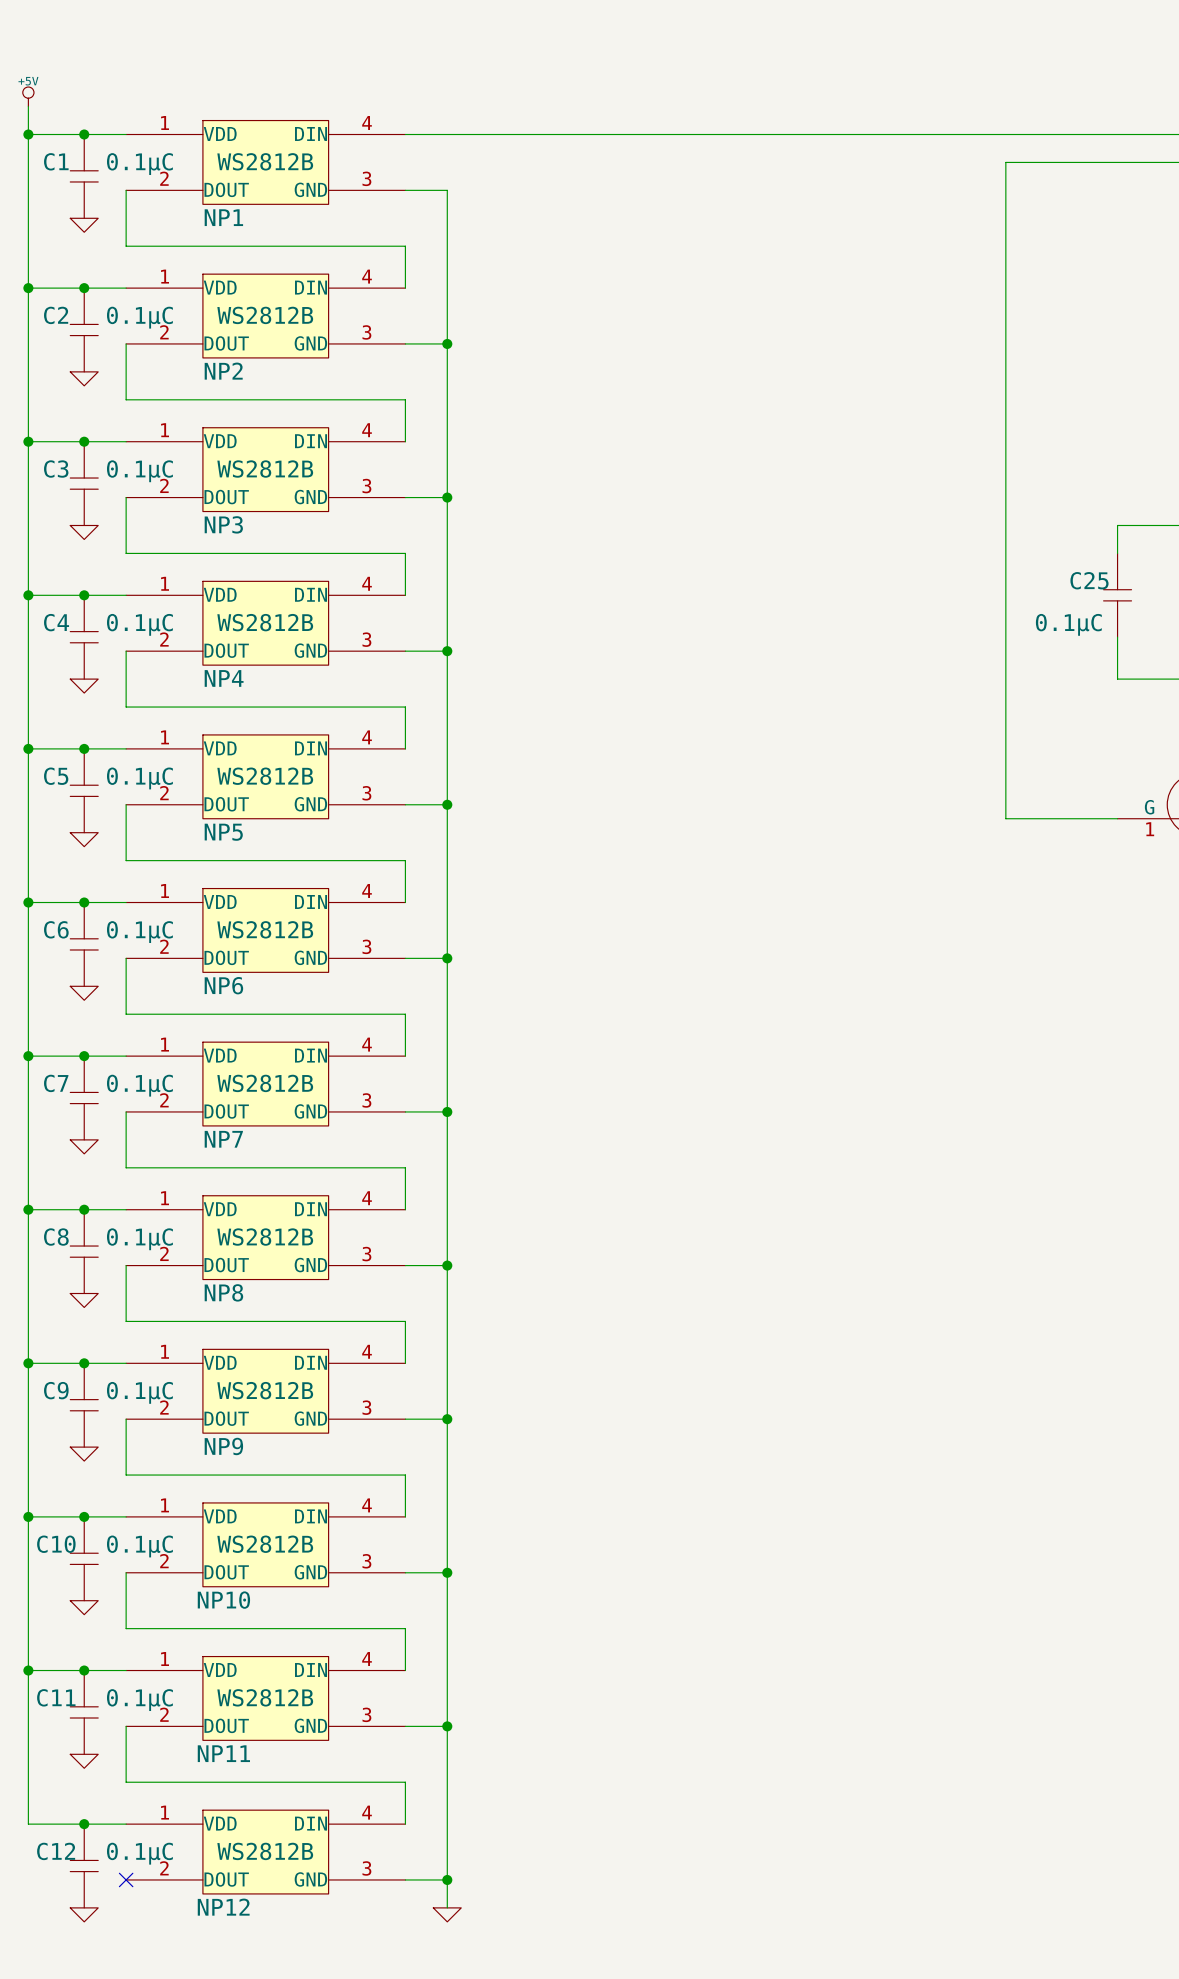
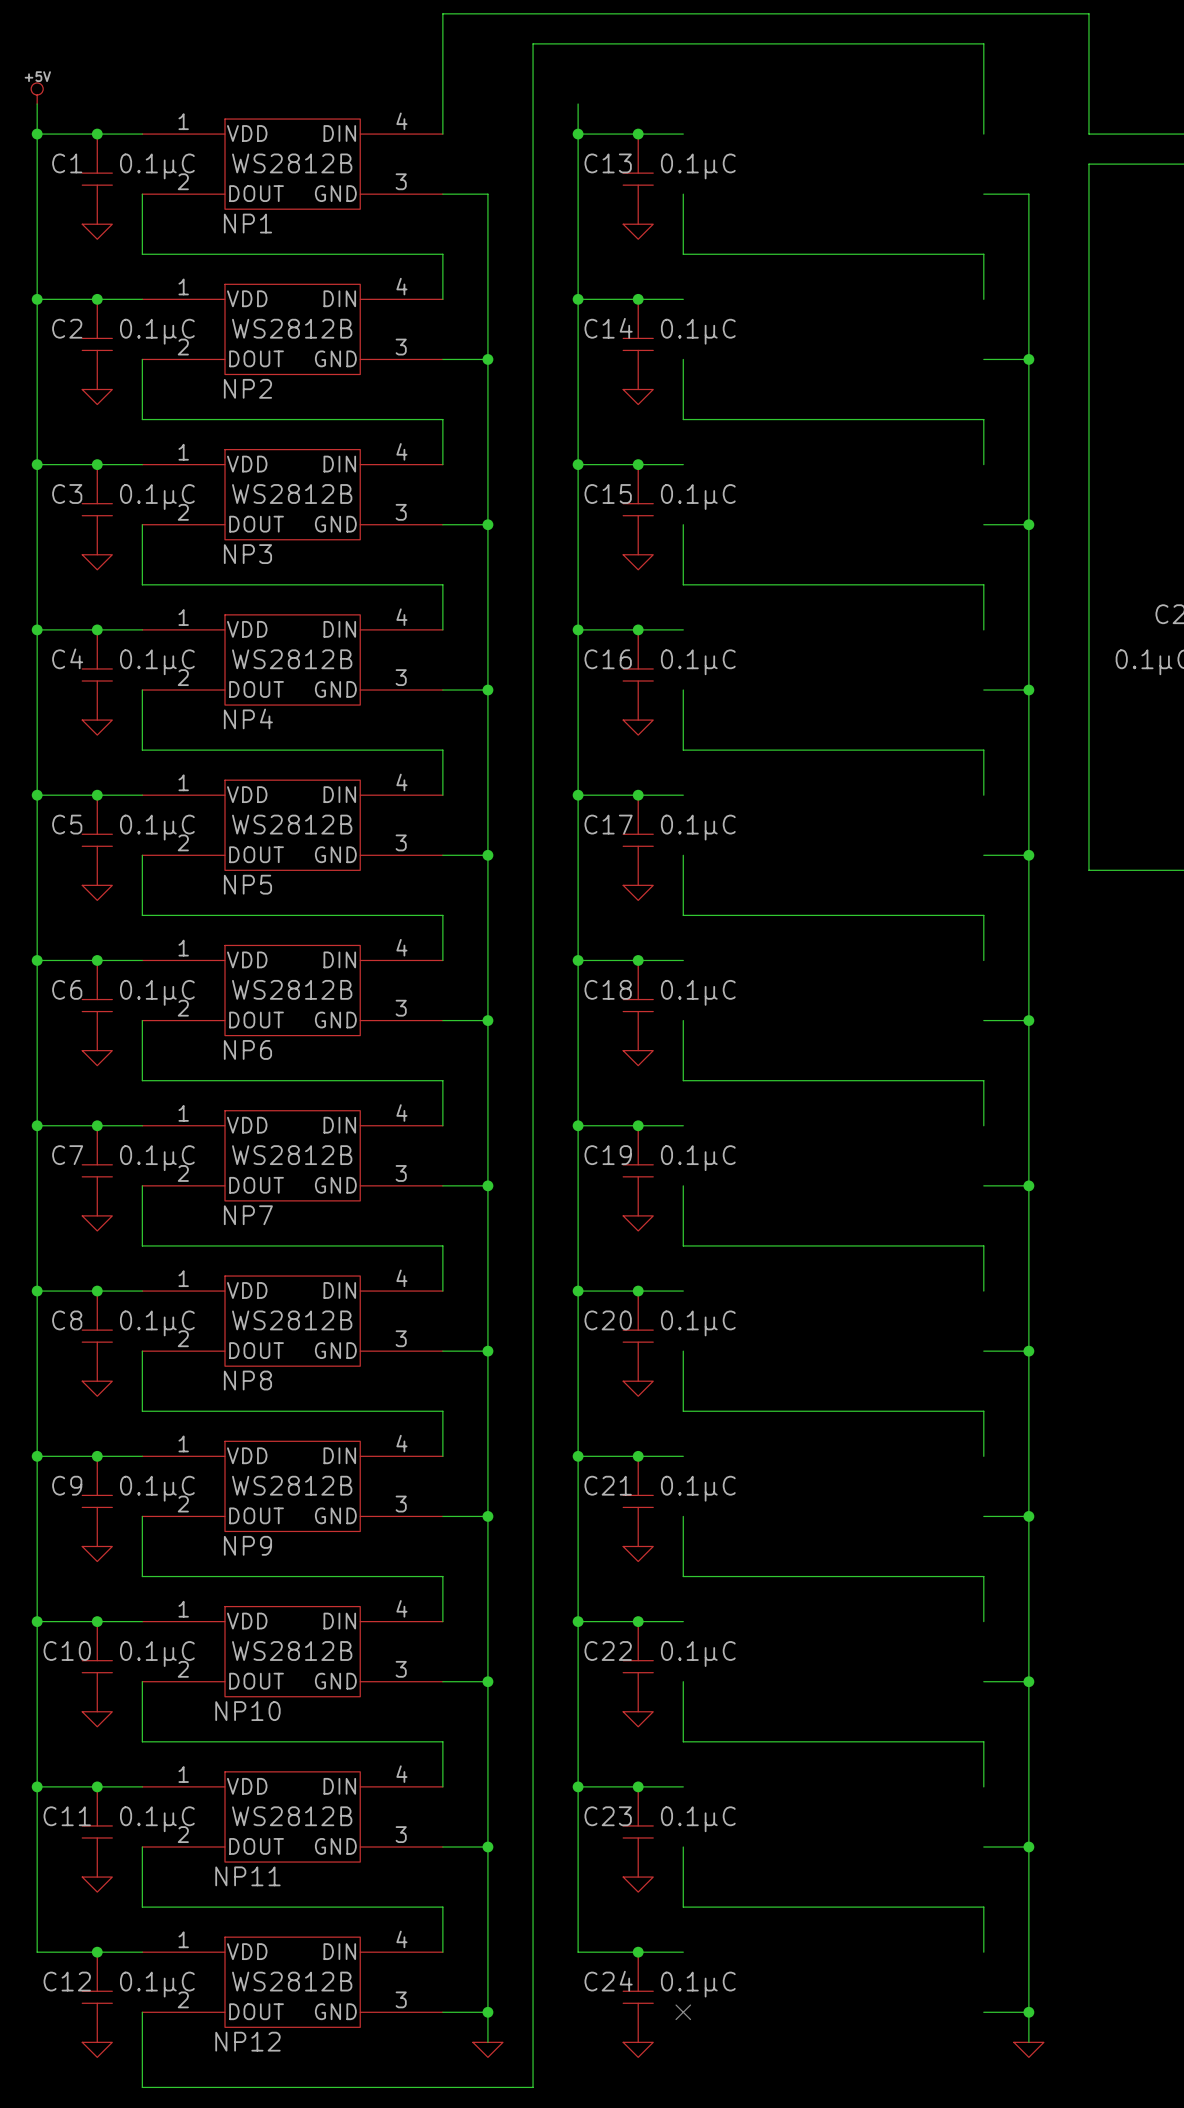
wire: none -> (578, 104) (578, 1952) (683, 1952)
wire: (405, 134) (531, 134) -> none
junction: none -> (578, 134)
junction: none -> (638, 134)
wire: (628, 134) (1005, 134) -> (442, 134) (442, 13) (1088, 13) (1088, 134)
wire: none -> (983, 134) (983, 43) (533, 43) (533, 2087) (142, 2087) (142, 2012)
C13: none -> (638, 179)
wire: none -> (683, 194) (683, 254) (983, 254) (983, 299)
wire: none -> (983, 194) (1028, 194) (1028, 2042)
power symbol: none -> (638, 231)
wire: none -> (578, 299) (683, 299)
junction: none -> (578, 299)
junction: none -> (638, 299)
C14: none -> (638, 344)
wire: none -> (683, 359) (683, 419) (983, 419) (983, 464)
wire: none -> (983, 359) (1028, 359)
junction: none -> (1028, 359)
power symbol: none -> (638, 397)
wire: none -> (578, 464) (683, 464)
junction: none -> (578, 464)
junction: none -> (638, 464)
C15: none -> (638, 509)
wire: none -> (683, 524) (683, 584) (983, 584) (983, 629)
wire: none -> (983, 524) (1028, 524)
junction: none -> (1028, 524)
power symbol: none -> (638, 562)
wire: none -> (578, 629) (683, 629)
junction: none -> (578, 629)
junction: none -> (638, 629)
C16: none -> (638, 674)
wire: none -> (683, 690) (683, 750) (983, 750) (983, 795)
wire: none -> (983, 690) (1028, 690)
junction: none -> (1028, 690)
power symbol: none -> (638, 727)
wire: none -> (578, 795) (683, 795)
junction: none -> (578, 795)
junction: none -> (638, 795)
C17: none -> (638, 840)
wire: none -> (683, 855) (683, 915) (983, 915) (983, 960)
wire: none -> (983, 855) (1028, 855)
junction: none -> (1028, 855)
power symbol: none -> (638, 892)
wire: none -> (578, 960) (683, 960)
junction: none -> (578, 960)
junction: none -> (638, 960)
C18: none -> (638, 1005)
wire: none -> (683, 1020) (683, 1080) (983, 1080) (983, 1125)
wire: none -> (983, 1020) (1028, 1020)
junction: none -> (1028, 1020)
power symbol: none -> (638, 1058)
wire: none -> (578, 1125) (683, 1125)
junction: none -> (578, 1125)
junction: none -> (638, 1125)
C19: none -> (638, 1170)
wire: none -> (683, 1185) (683, 1245) (983, 1245) (983, 1291)
wire: none -> (983, 1185) (1028, 1185)
junction: none -> (1028, 1185)
power symbol: none -> (638, 1223)
wire: none -> (578, 1291) (683, 1291)
junction: none -> (578, 1291)
junction: none -> (638, 1291)
C20: none -> (638, 1336)
wire: none -> (683, 1351) (683, 1411) (983, 1411) (983, 1456)
wire: none -> (983, 1351) (1028, 1351)
junction: none -> (1028, 1351)
power symbol: none -> (638, 1388)
wire: none -> (578, 1456) (683, 1456)
junction: none -> (578, 1456)
junction: none -> (638, 1456)
C21: none -> (638, 1501)
wire: none -> (683, 1516) (683, 1576) (983, 1576) (983, 1621)
wire: none -> (983, 1516) (1028, 1516)
junction: none -> (1028, 1516)
power symbol: none -> (638, 1553)
wire: none -> (578, 1621) (683, 1621)
junction: none -> (578, 1621)
junction: none -> (638, 1621)
C22: none -> (638, 1666)
wire: none -> (683, 1681) (683, 1741) (983, 1741) (983, 1786)
wire: none -> (983, 1681) (1028, 1681)
junction: none -> (1028, 1681)
power symbol: none -> (638, 1719)
wire: none -> (578, 1786) (683, 1786)
junction: none -> (578, 1786)
junction: none -> (638, 1786)
C23: none -> (638, 1831)
wire: none -> (683, 1847) (683, 1907) (983, 1907) (983, 1952)
wire: none -> (983, 1847) (1028, 1847)
junction: none -> (1028, 1847)
power symbol: none -> (638, 1884)
junction: none -> (638, 1952)
C24: none -> (638, 1997)
no-connect mark: (126, 1879) -> none
no-connect mark: none -> (683, 2012)
wire: none -> (983, 2012) (1028, 2012)
junction: none -> (1028, 2012)
power symbol: none -> (638, 2049)
power symbol: none -> (1028, 2049)

